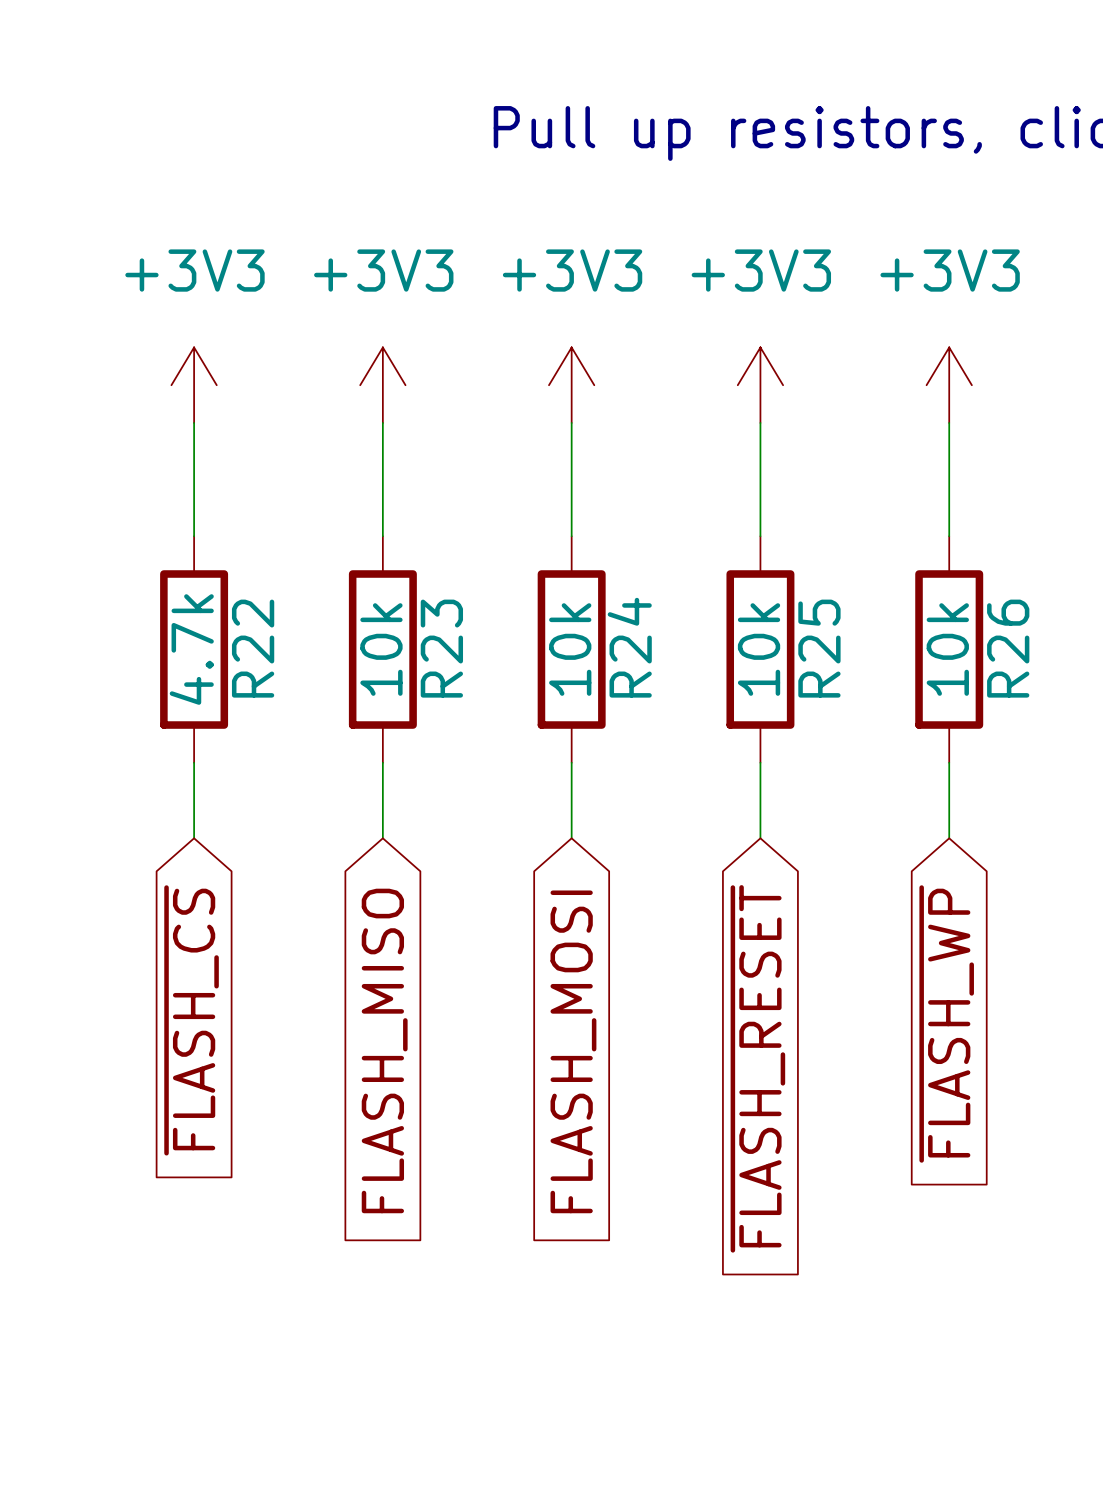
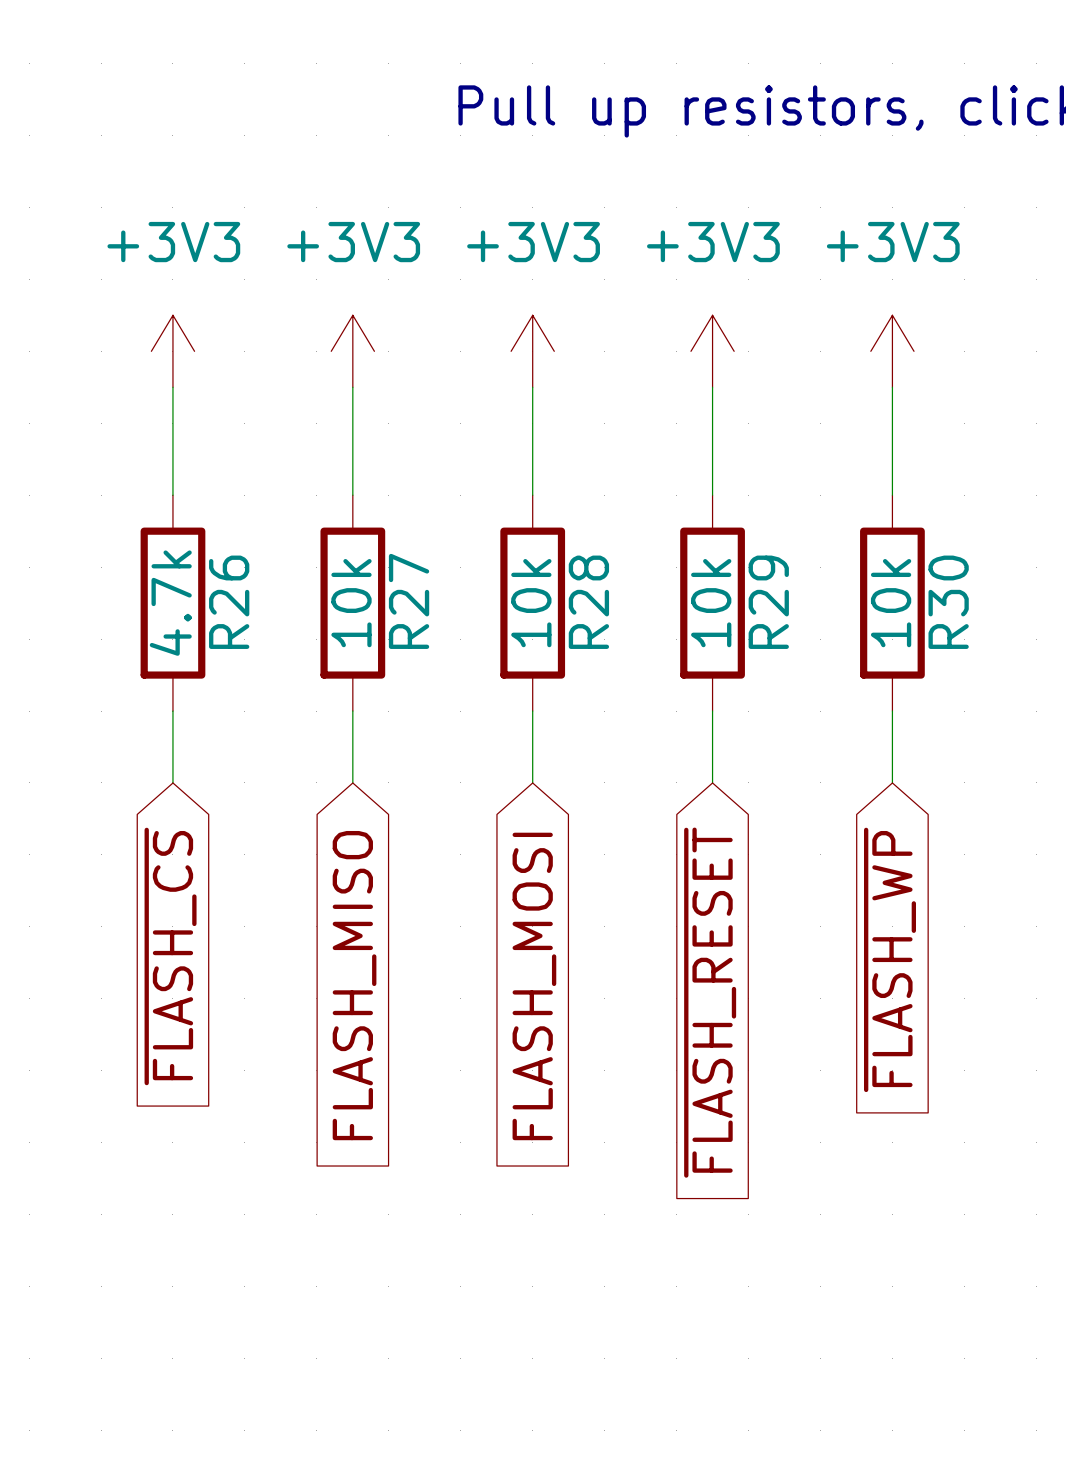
R24 name: R24 (629, 647) -> R28 (588, 602)
R22 name: R22 (253, 648) -> R26 (229, 602)
R23 name: R23 (441, 648) -> R27 (409, 601)
R25 name: R25 (819, 648) -> R29 (768, 602)
R26 name: R26 (1008, 648) -> R30 (948, 602)

